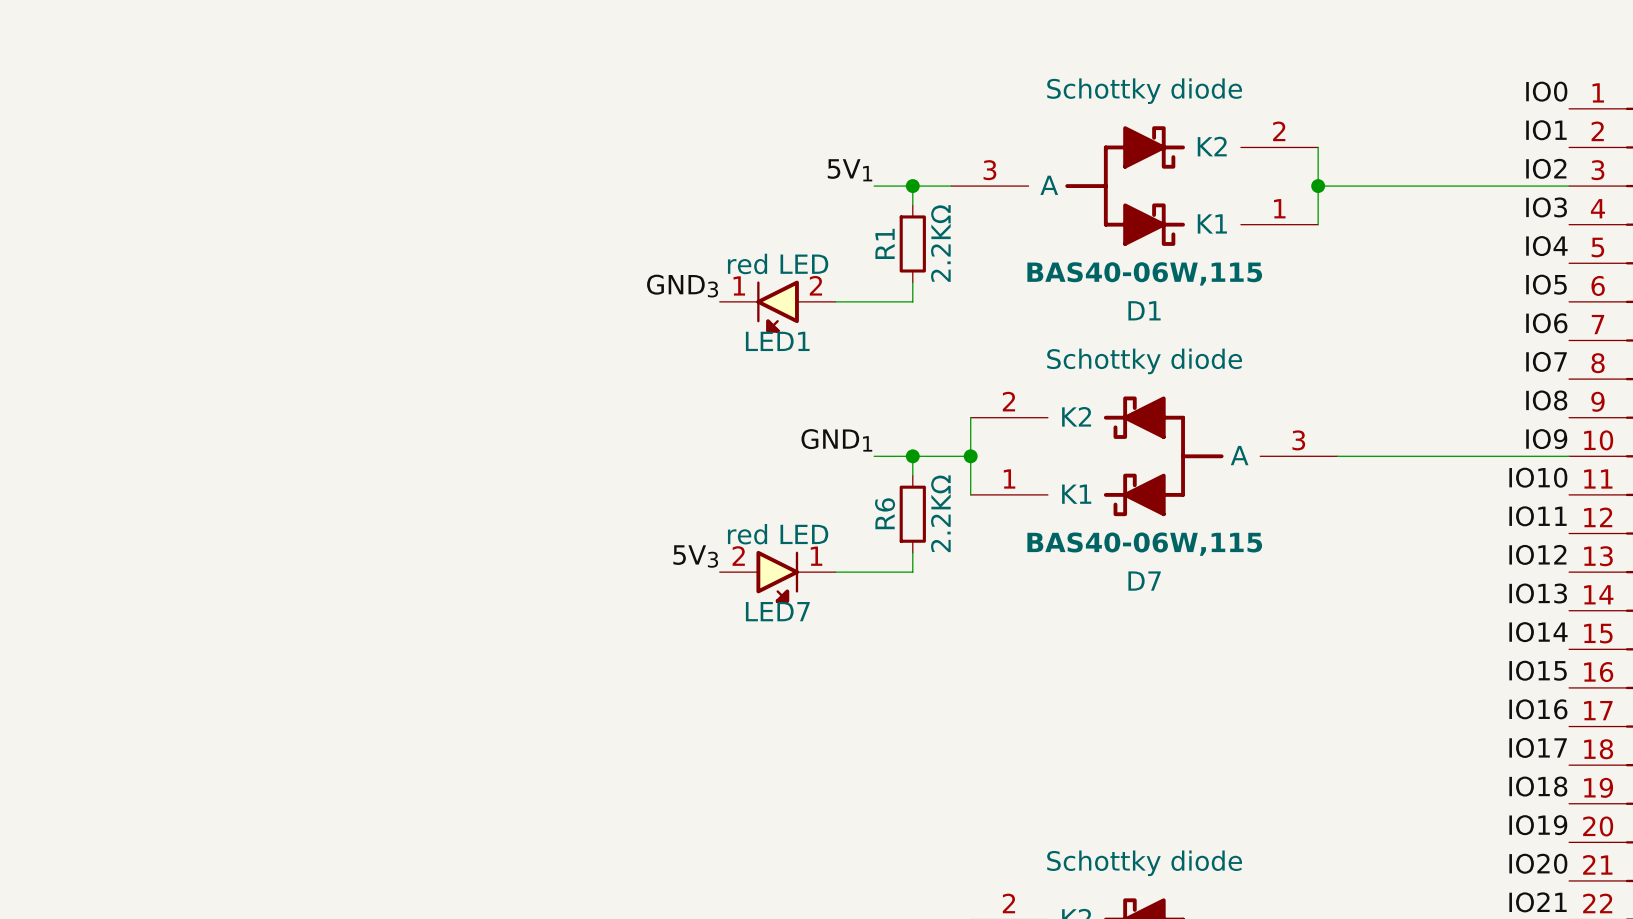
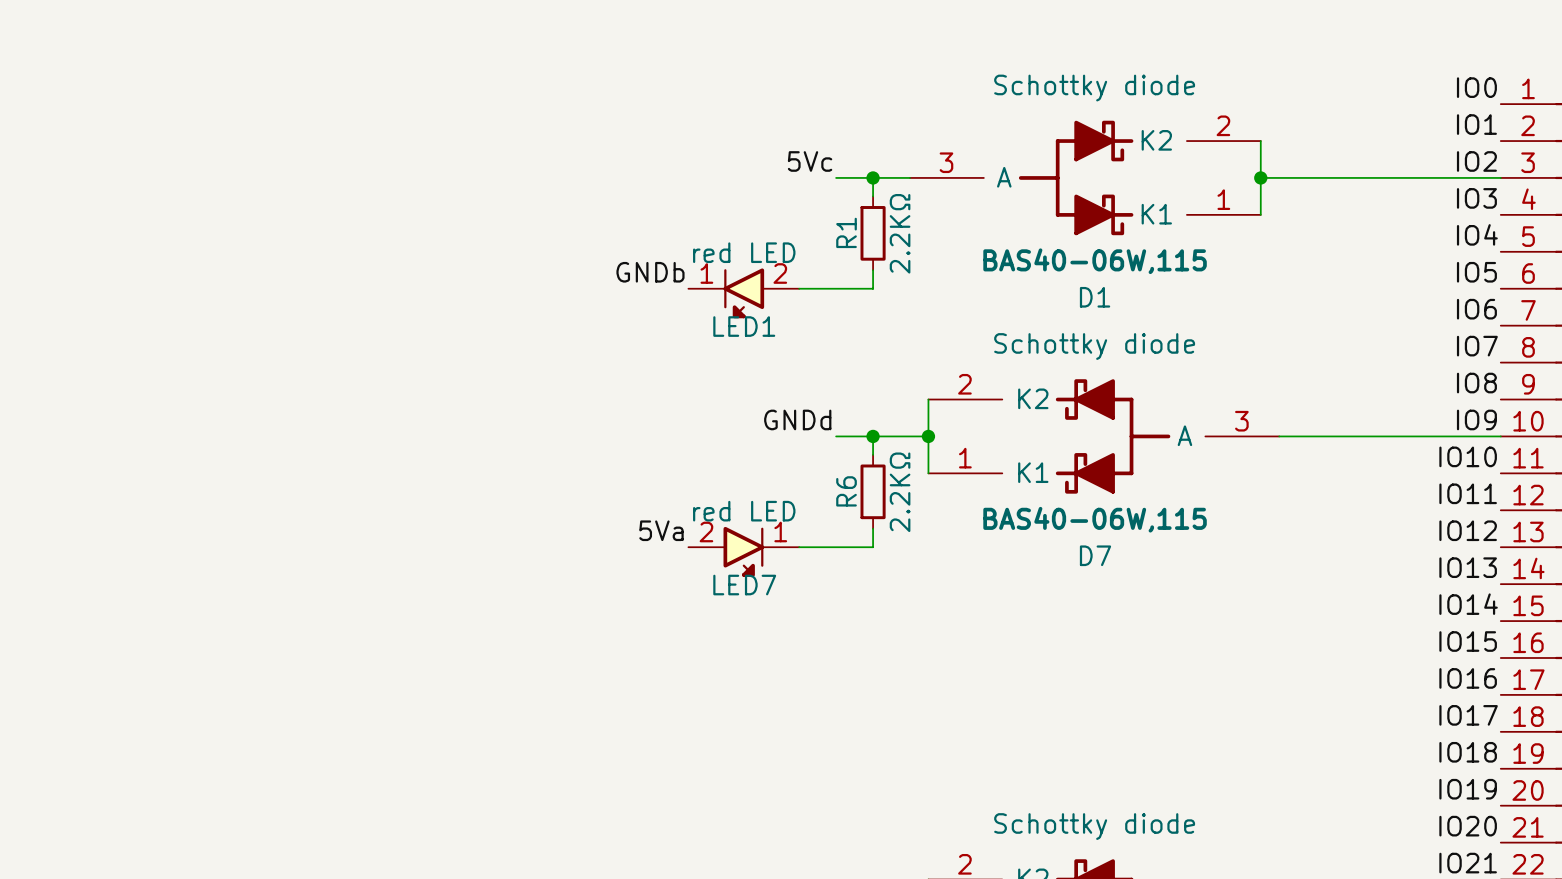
label: 5V1 (850, 170) -> 5Vc (810, 161)
label: GND3 (682, 286) -> GNDb (650, 272)
label: GND1 (836, 440) -> GNDd (797, 419)
label: 5V3 (695, 556) -> 5Va (661, 530)

